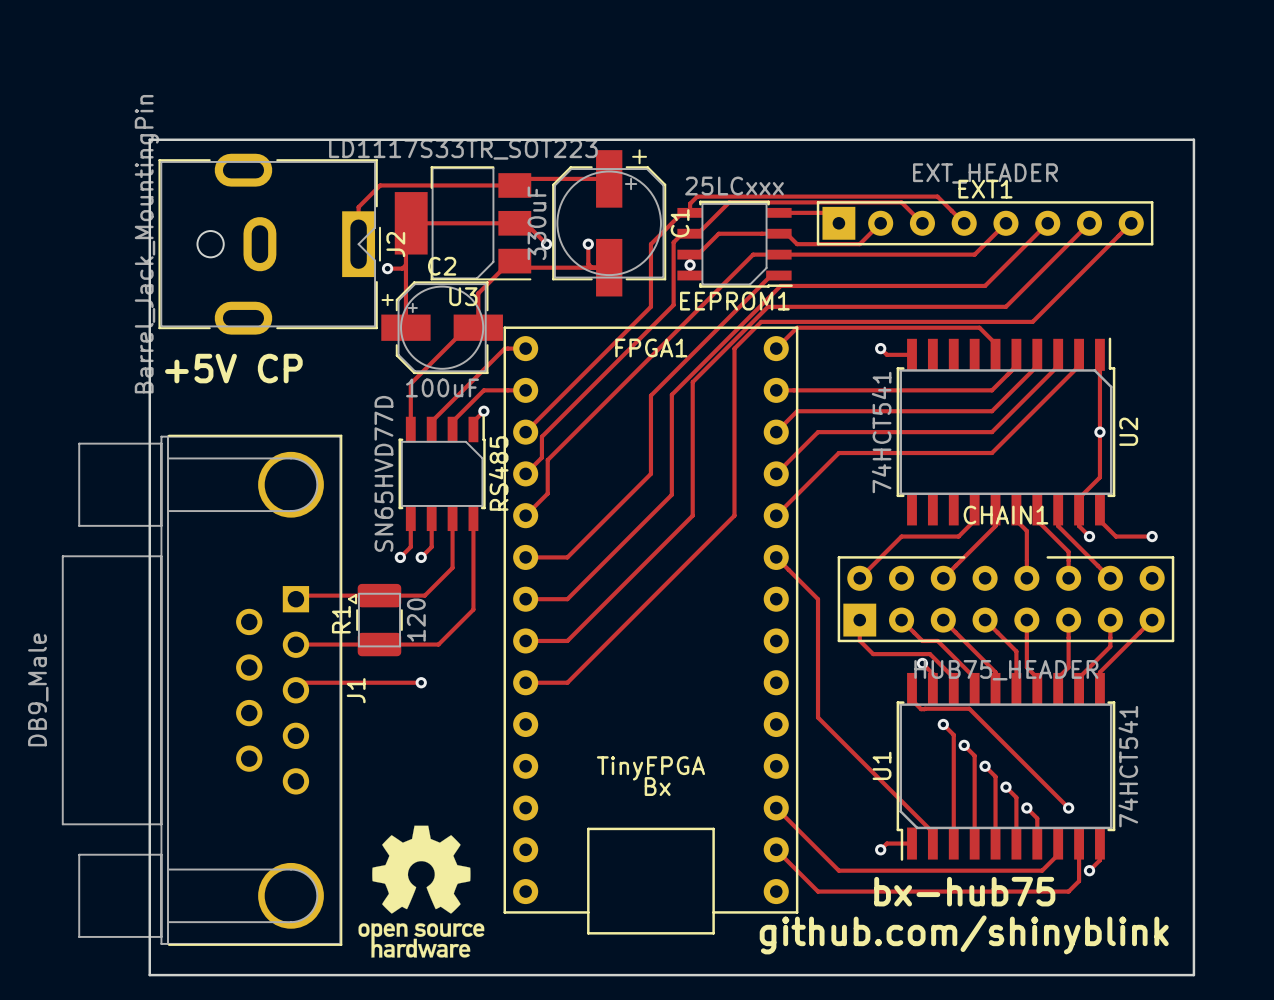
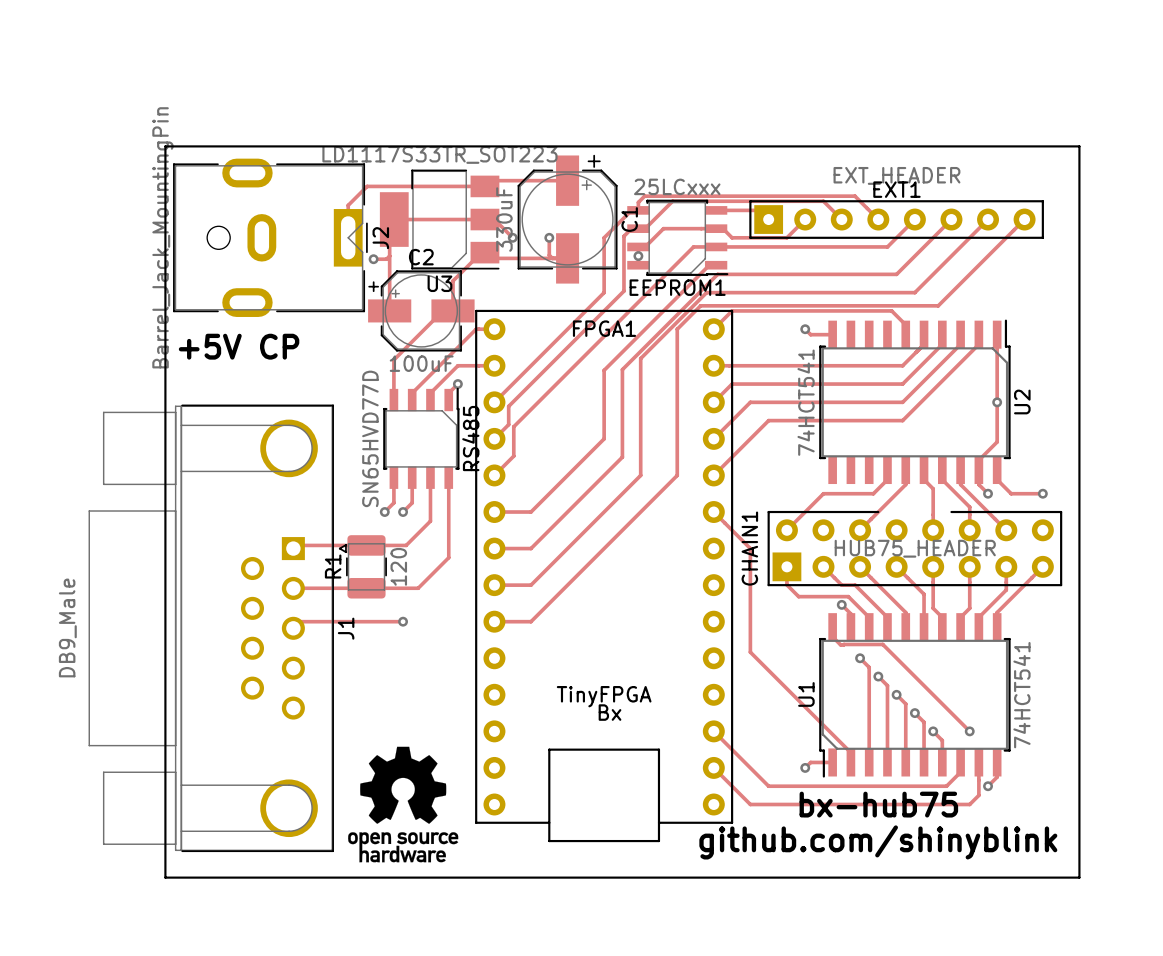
CHAIN1 name rotation: 0° (1005, 515) -> 90° counterclockwise (749, 548)
CHAIN1 name position: CHAIN1 (1005, 515) -> CHAIN1 (749, 548)
CHAIN1 value position: HUB75_HEADER (1006, 670) -> HUB75_HEADER (915, 548)

